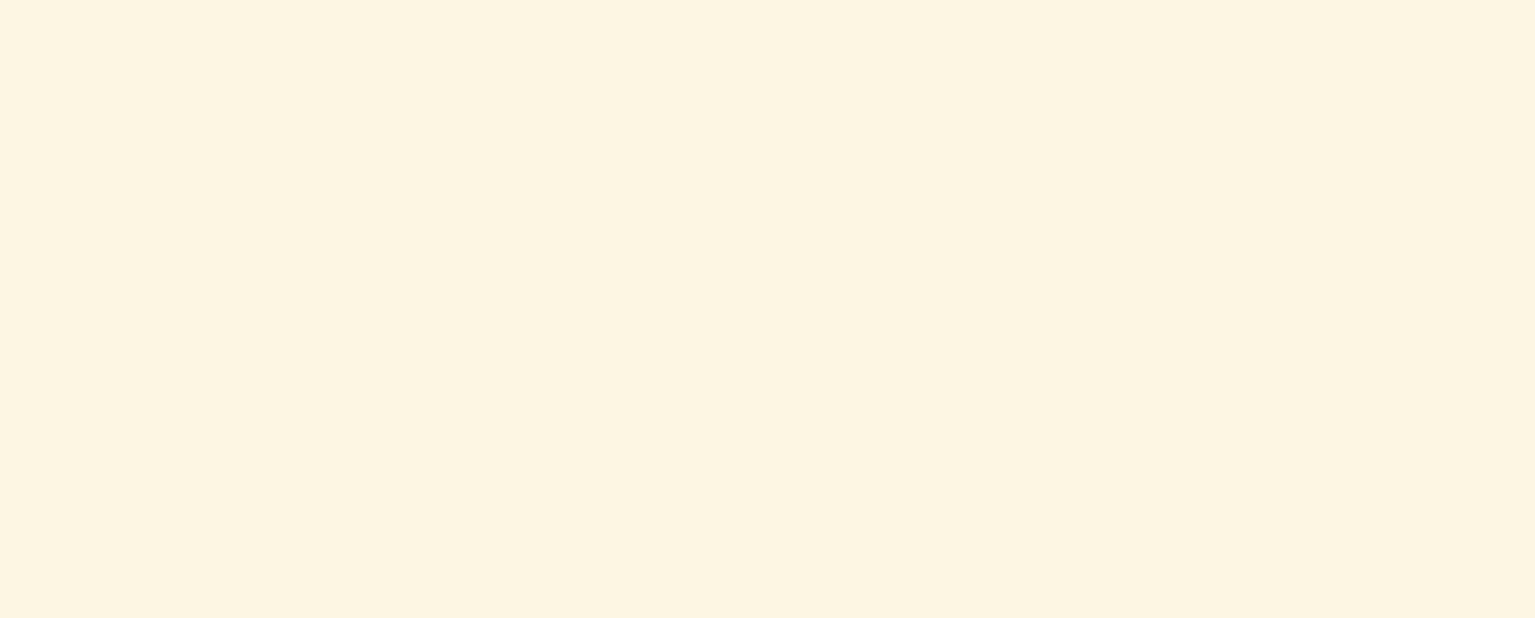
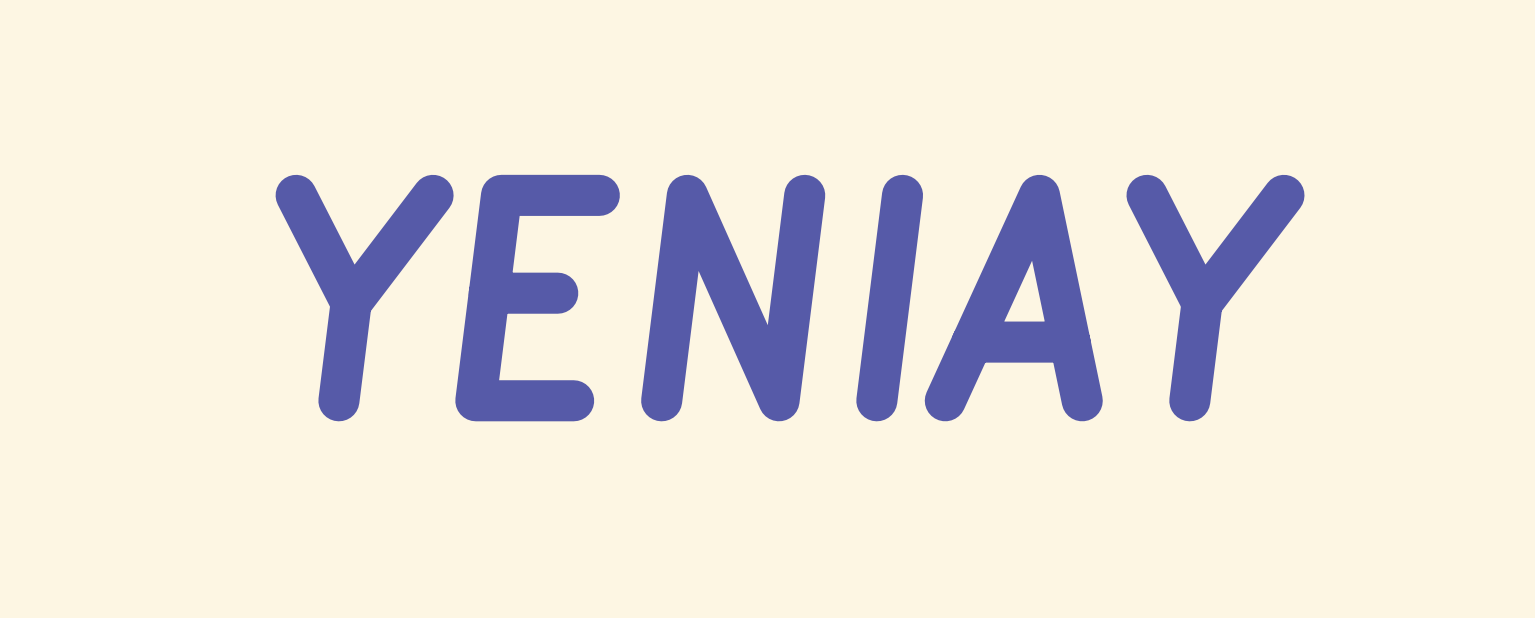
text: none -> YENIAY (790, 298)

